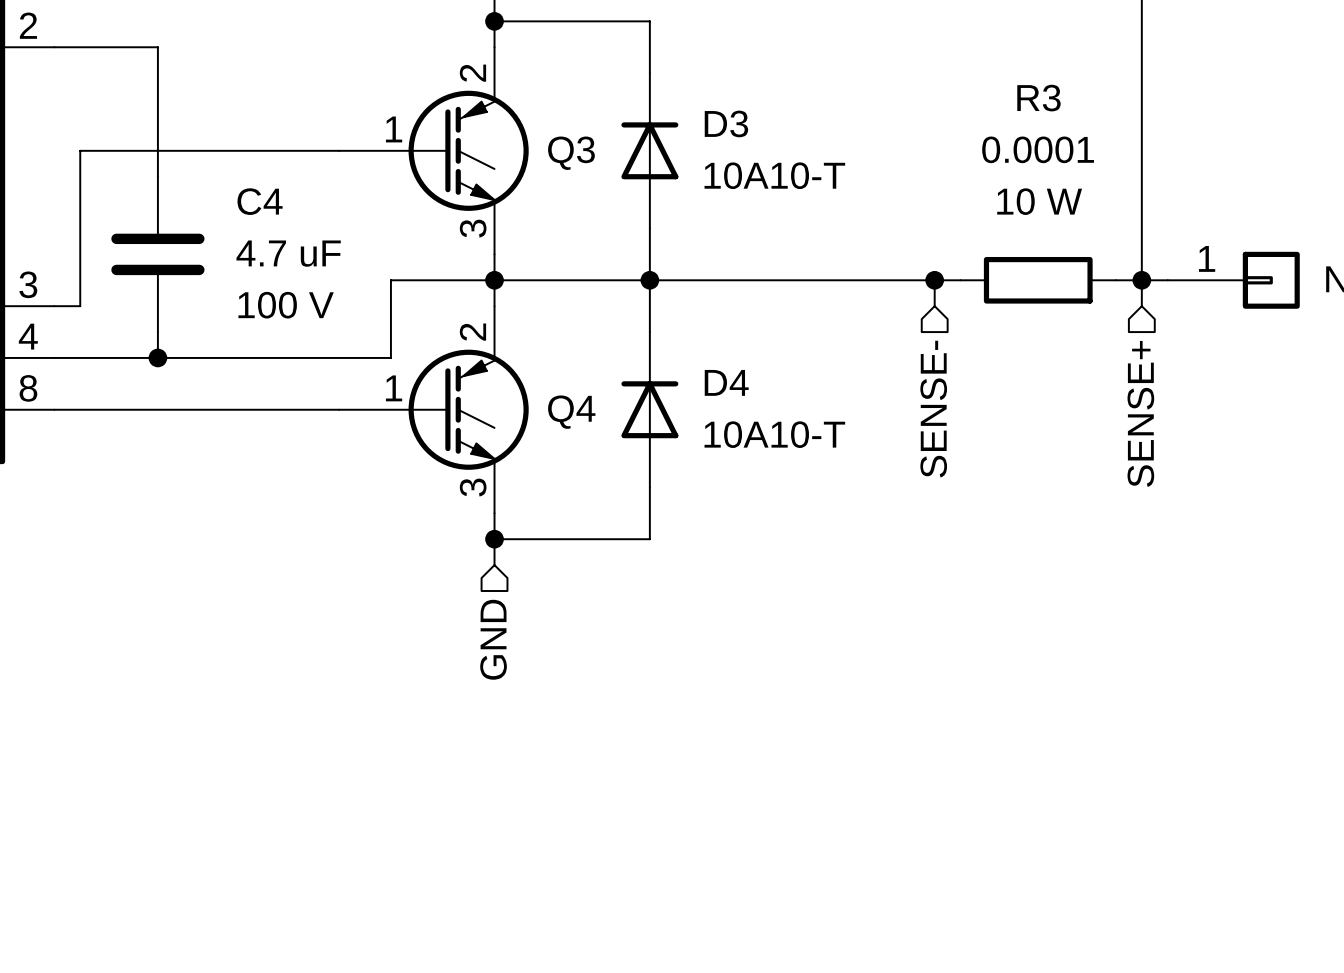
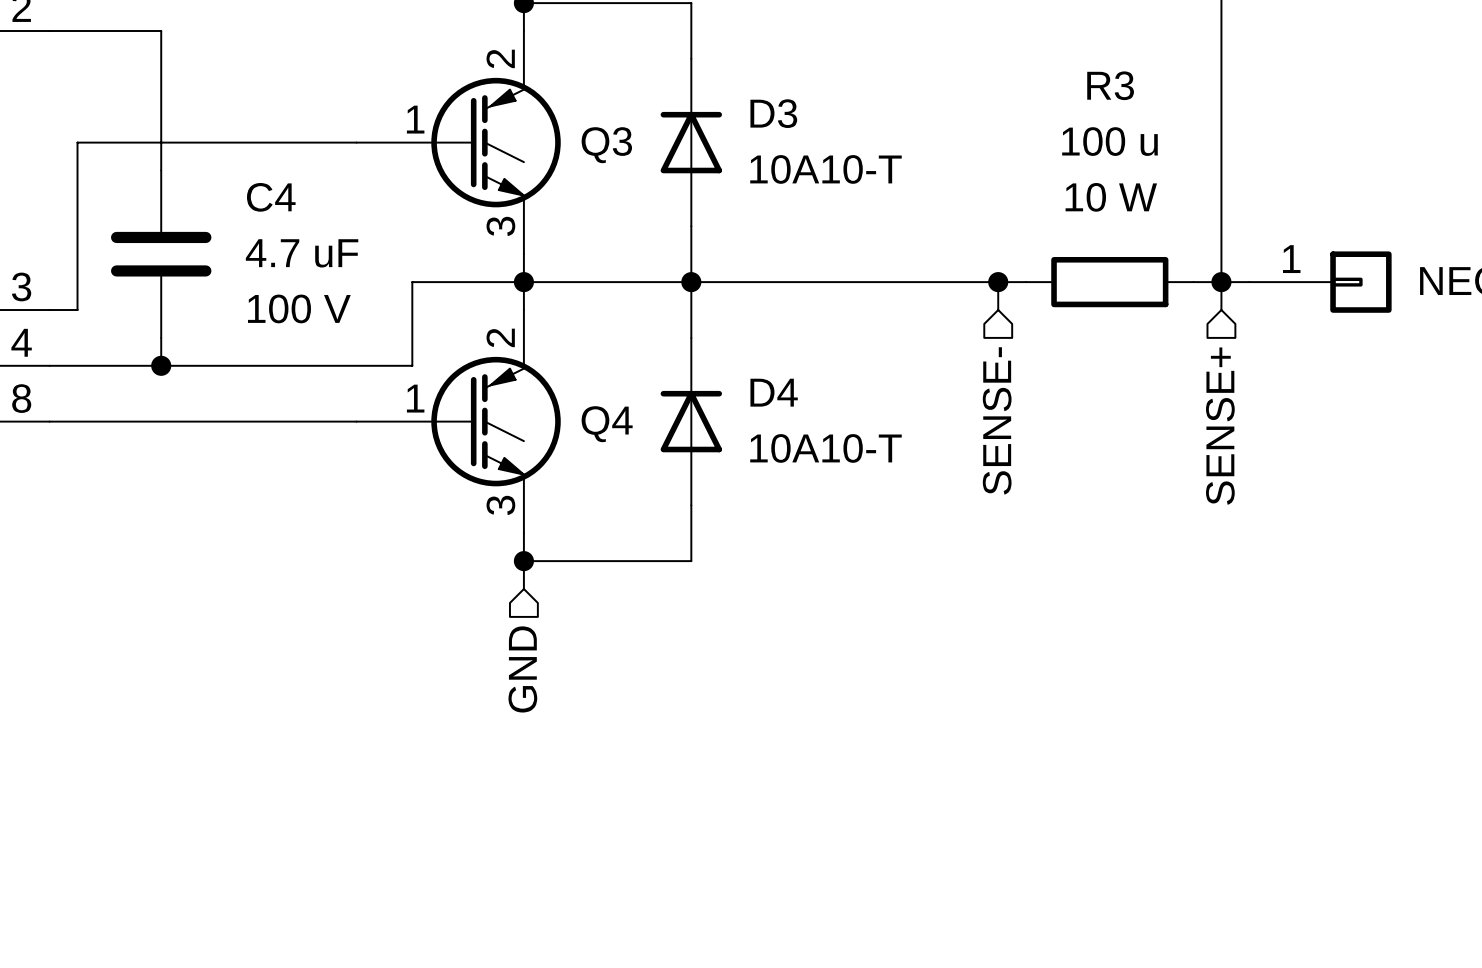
R3 value: 0.0001 (1038, 149) -> 100 u (1110, 141)

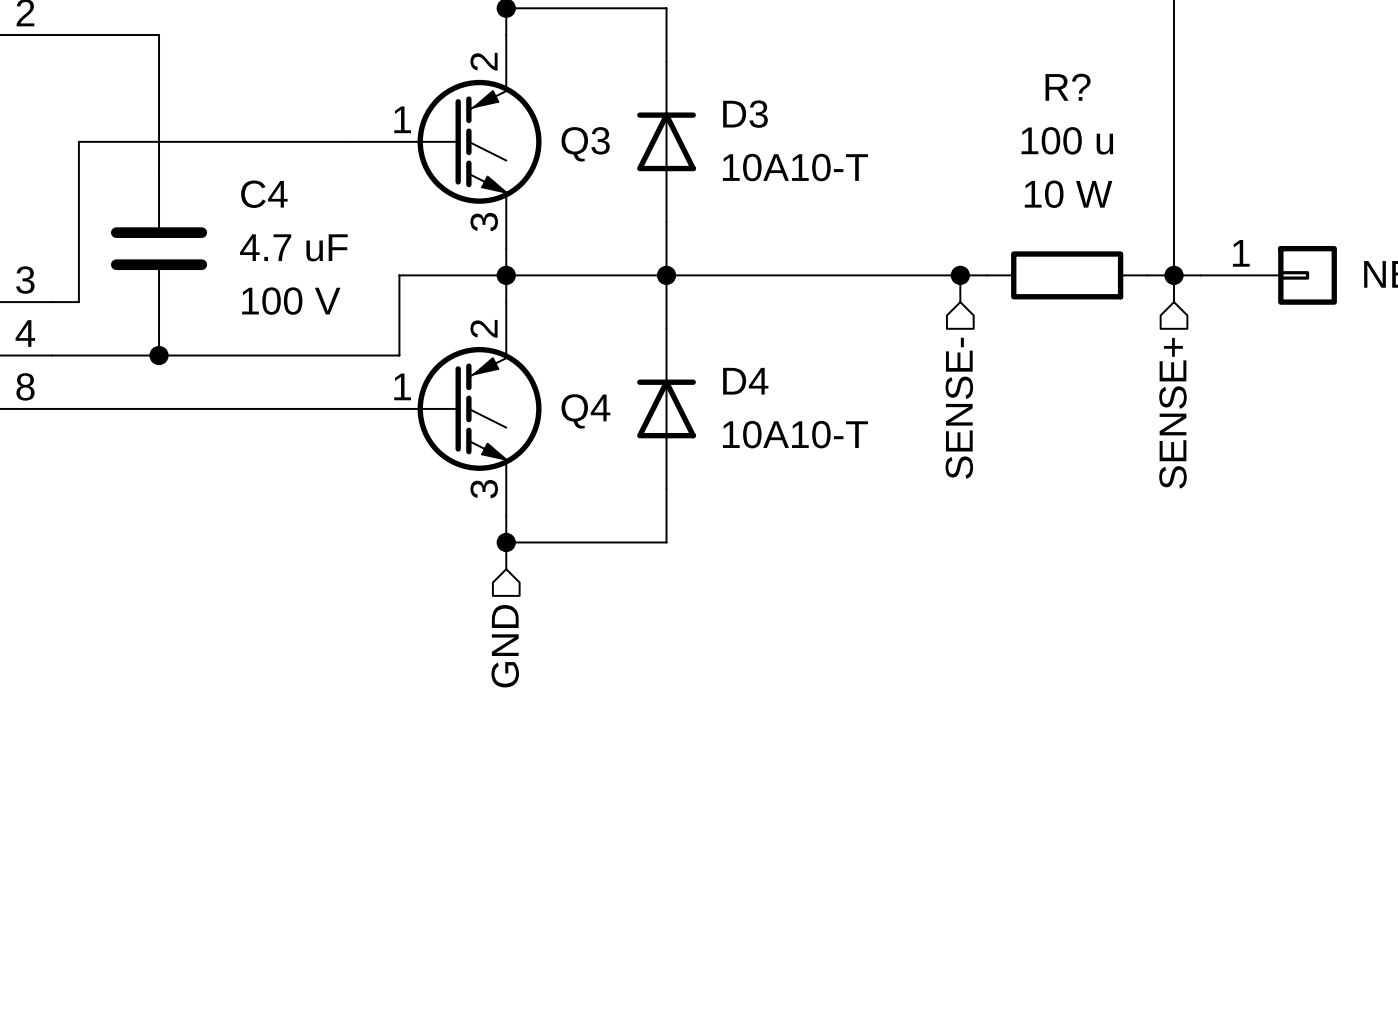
R3 name: R3 (1110, 85) -> R? (1068, 87)

